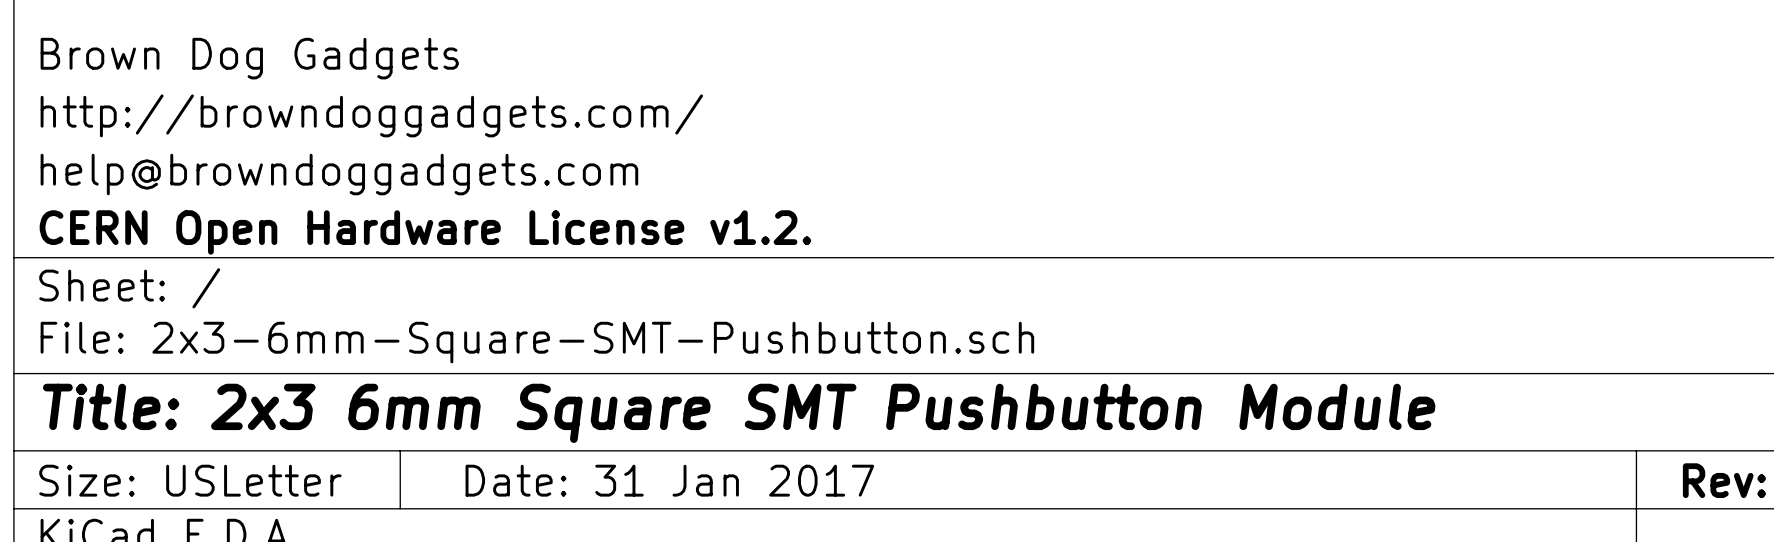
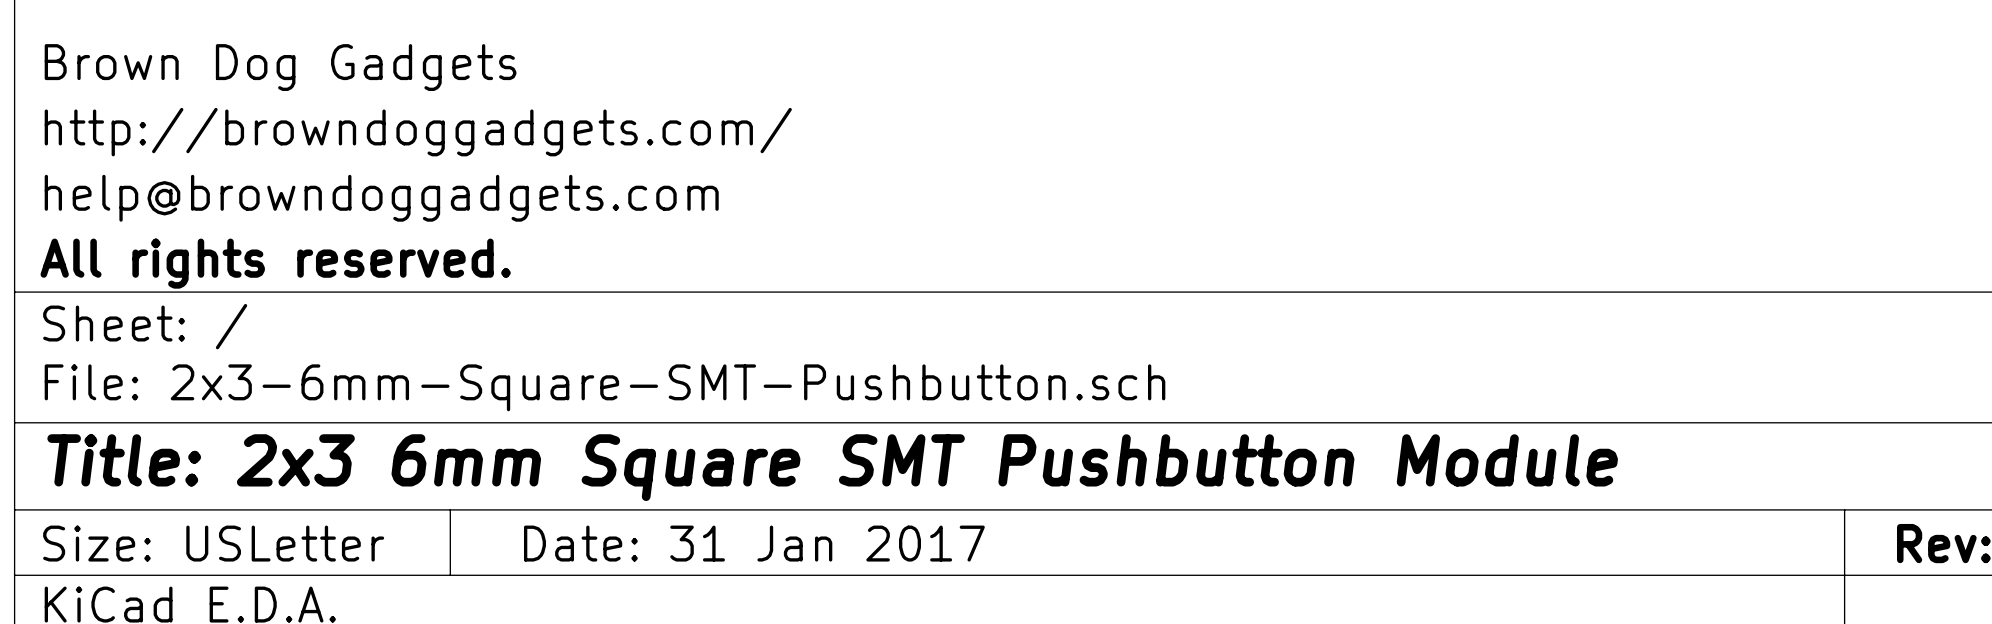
title block: CERN Open Hardware License v1.2. (425, 232) -> All rights reserved. (275, 263)

